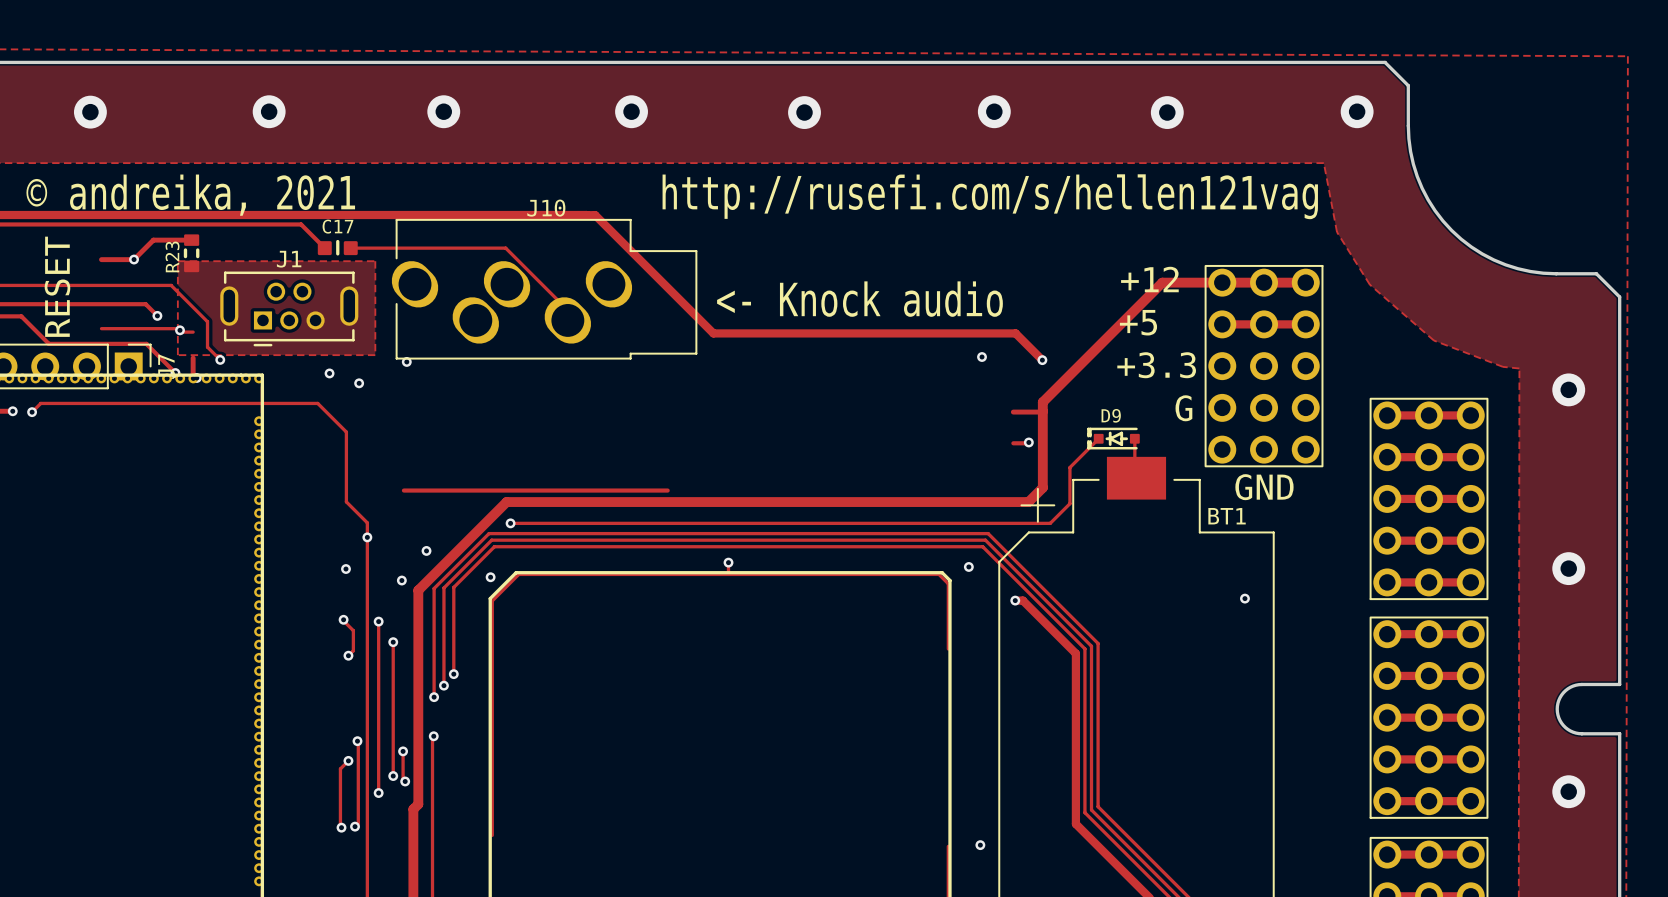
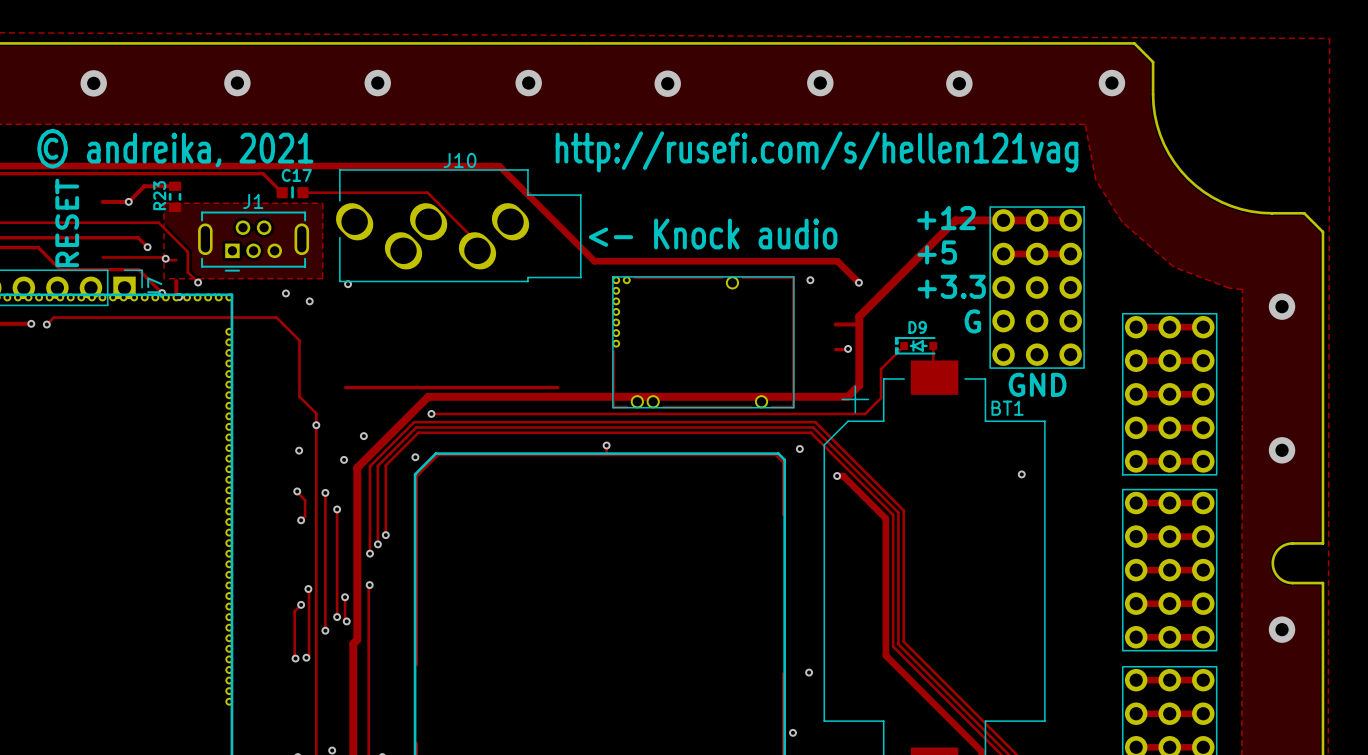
part: none -> (703, 342)

